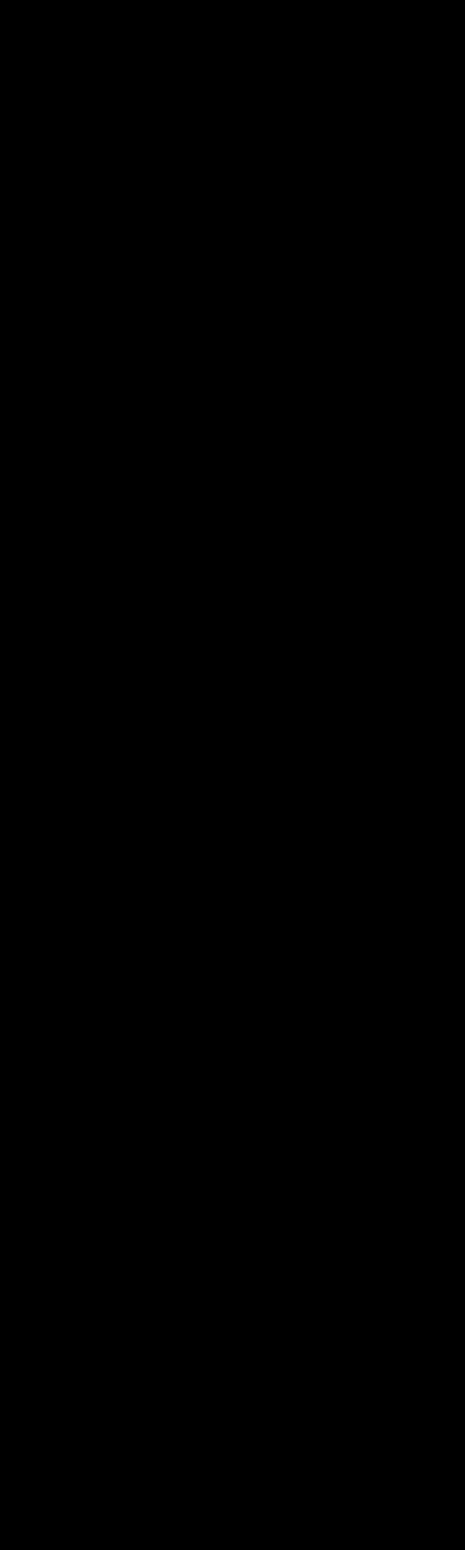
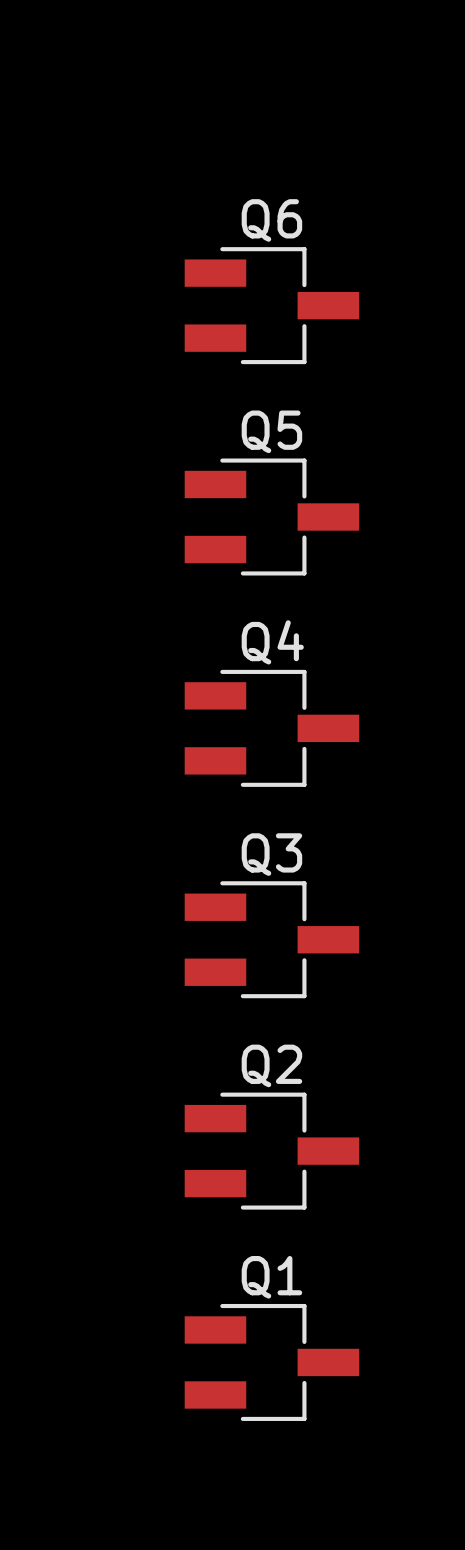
Q6: none -> (271, 305)
Q5: none -> (271, 517)
Q4: none -> (271, 728)
Q3: none -> (271, 939)
Q2: none -> (271, 1151)
Q1: none -> (271, 1362)

